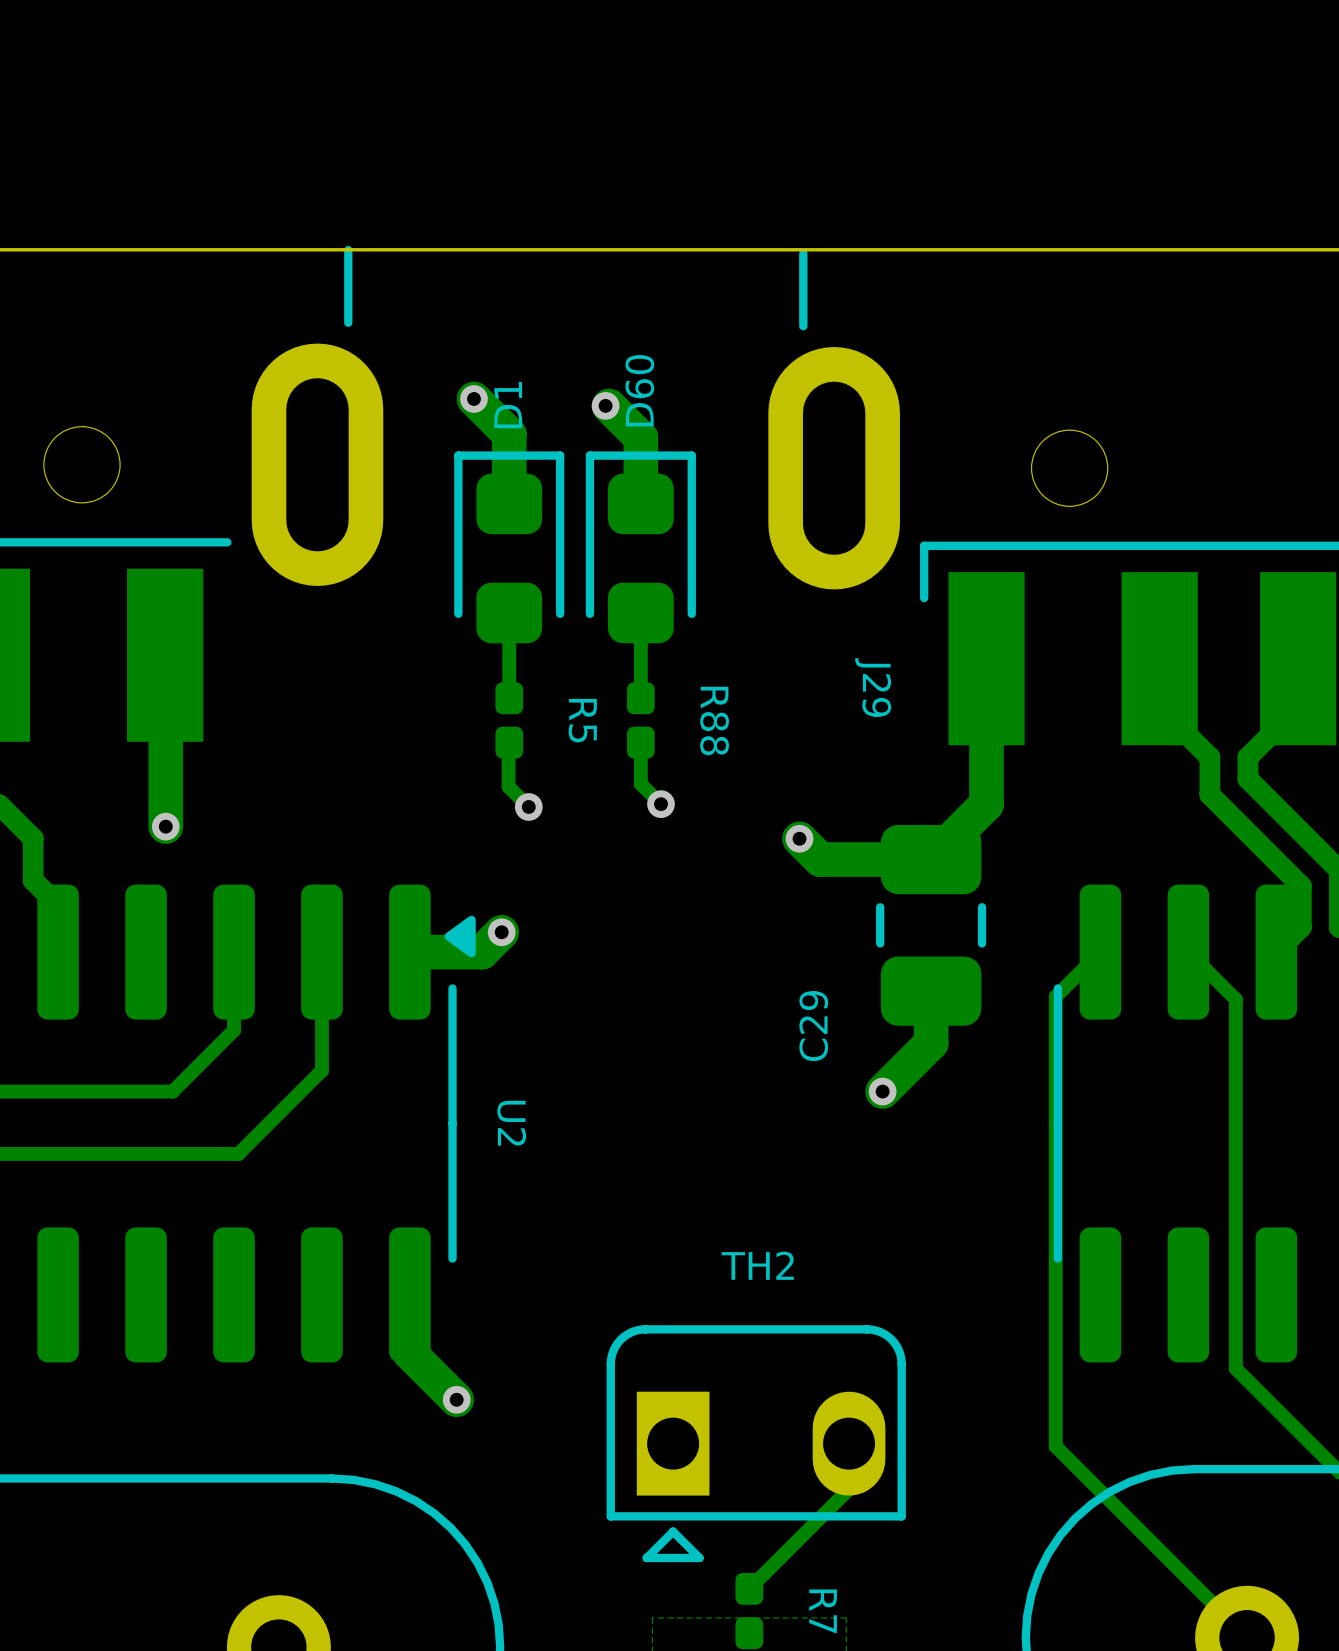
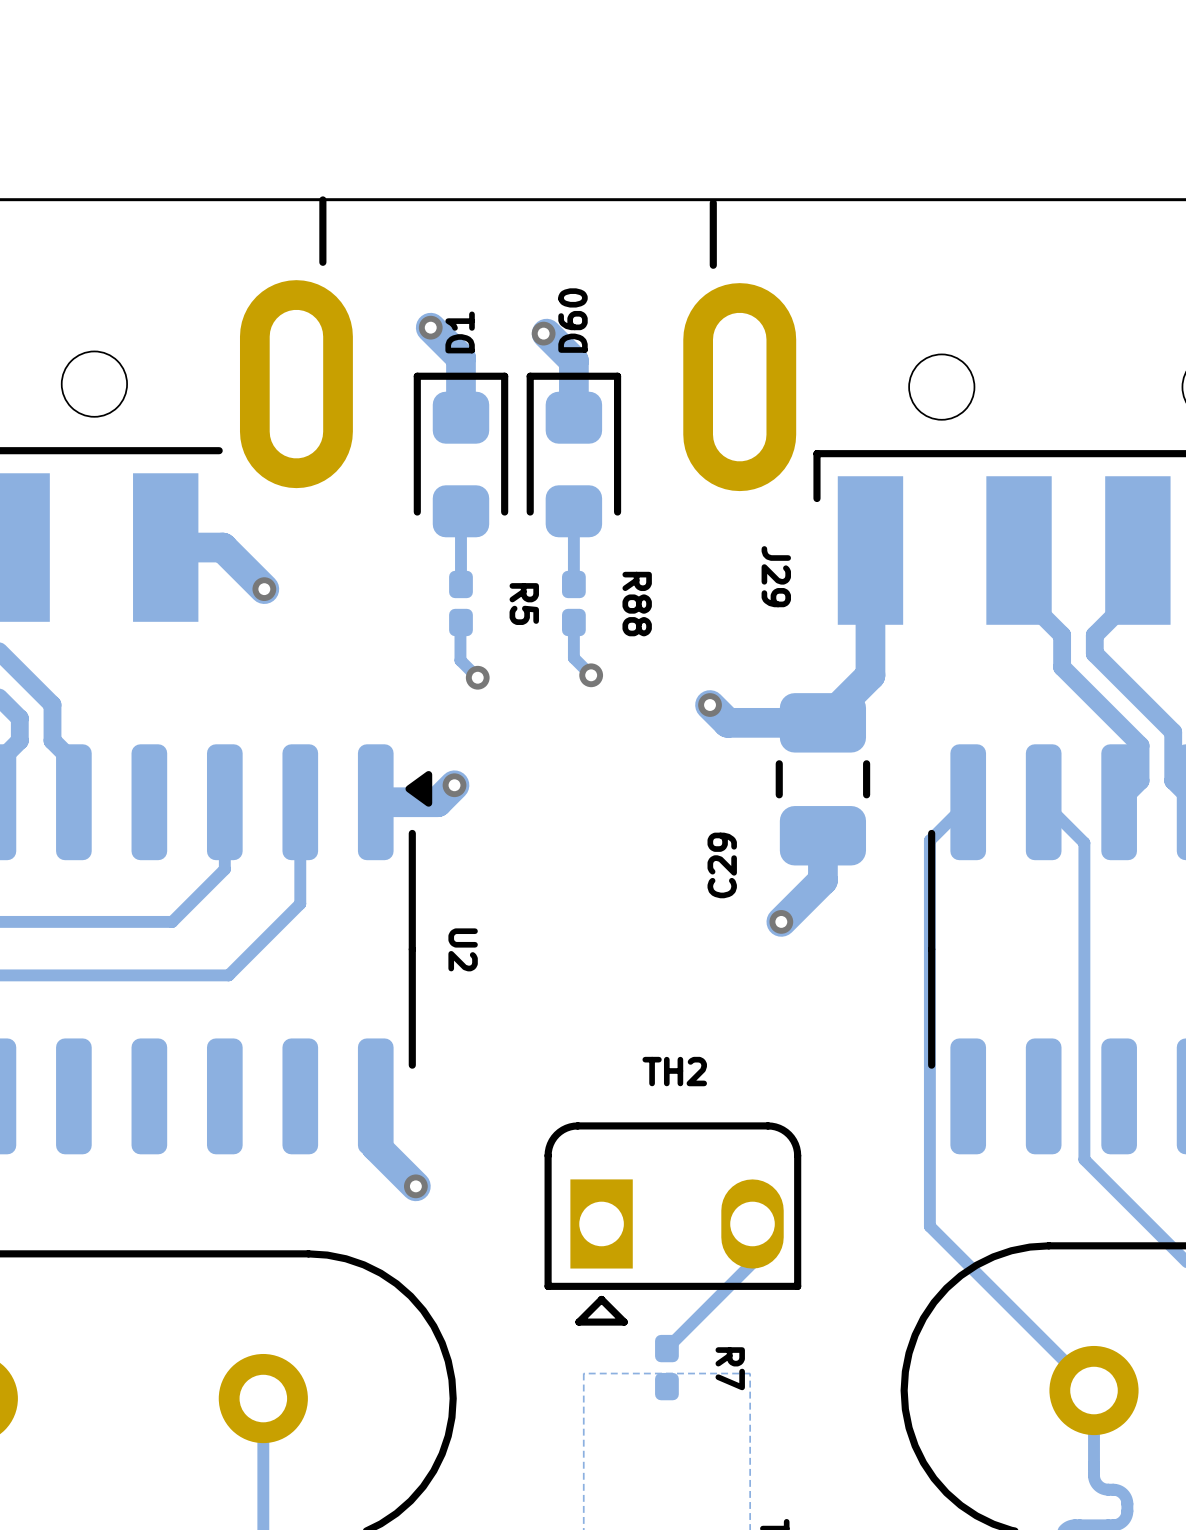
track: (165, 655) (165, 826) -> (165, 547) (222, 547) (264, 589)
via position: (165, 826) -> (264, 589)

